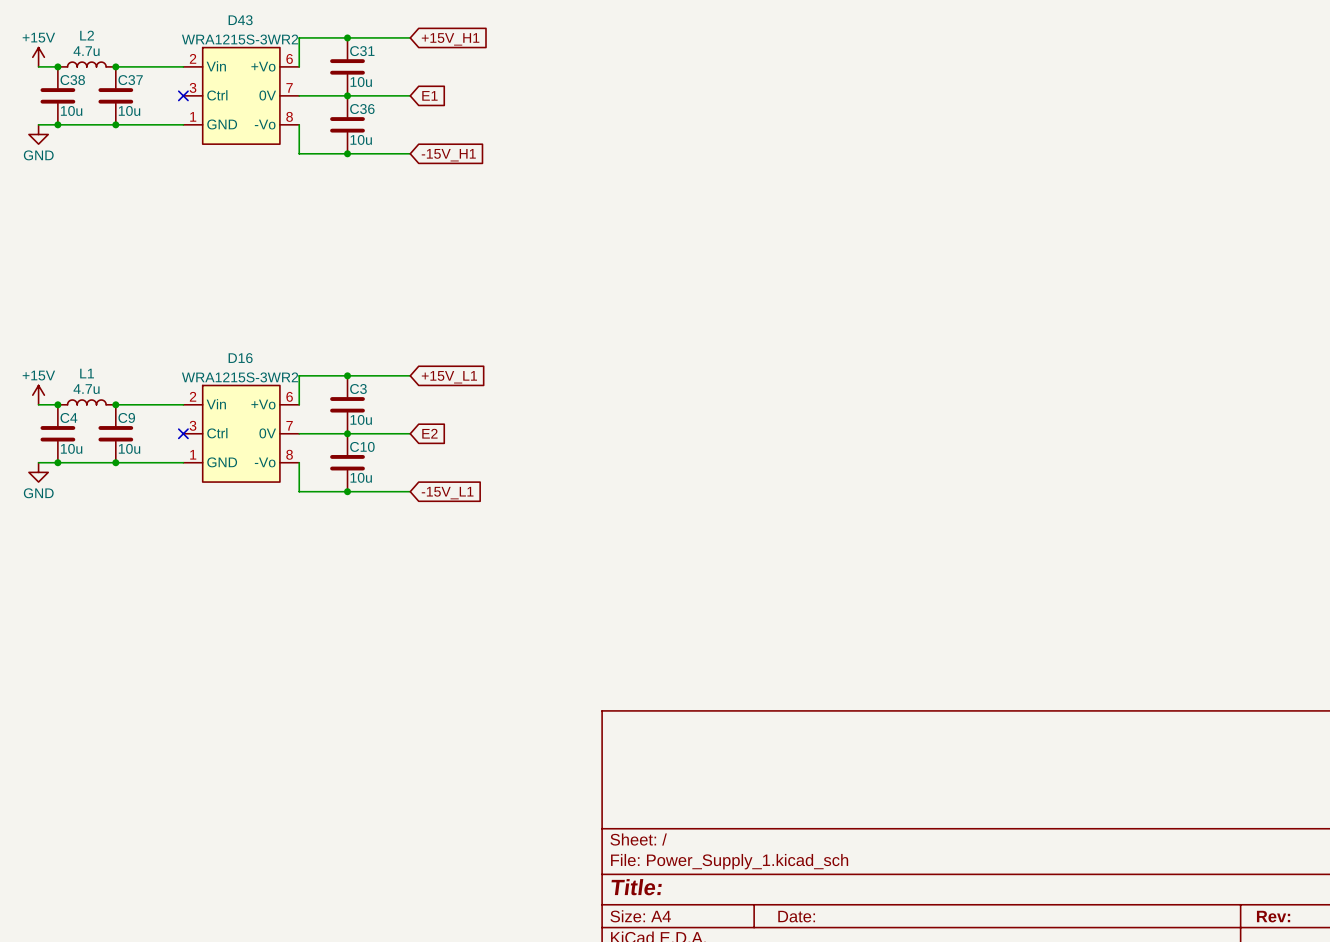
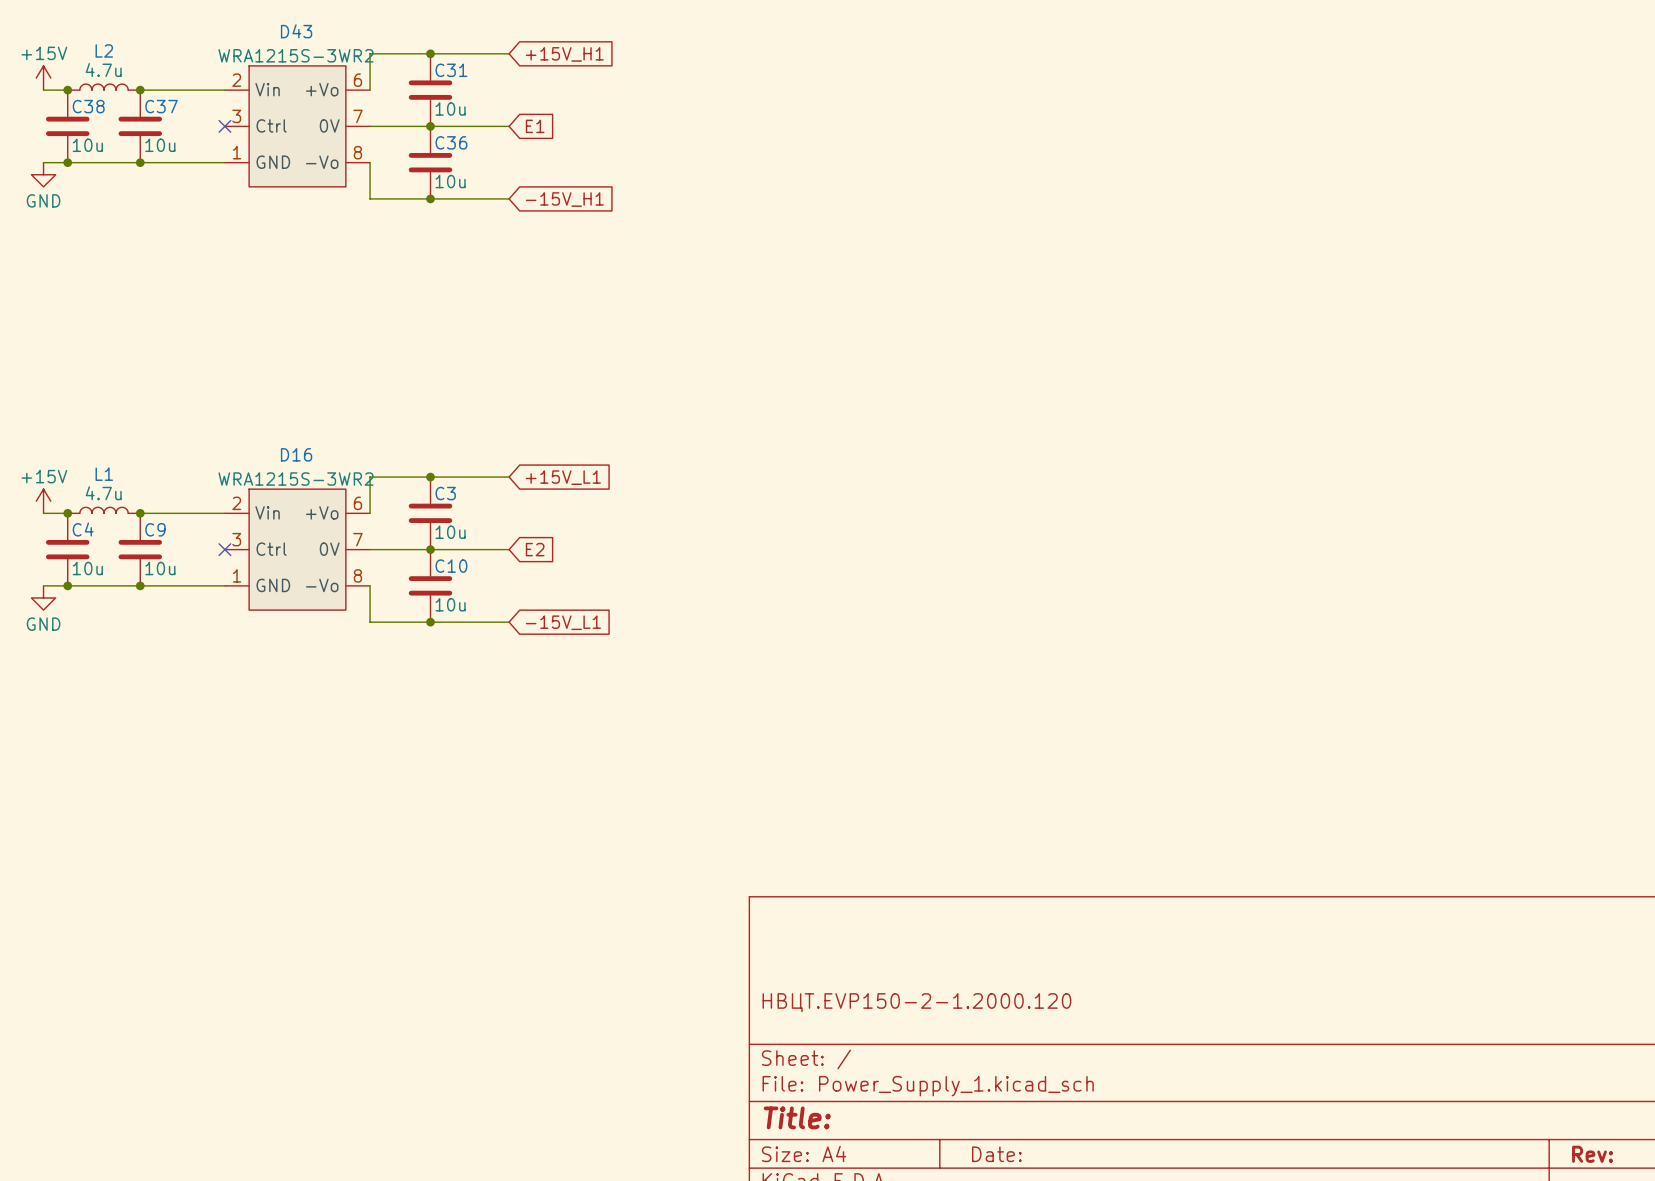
title block: none -> НВЦТ.EVP150-2-1.2000.120 (916, 1002)

